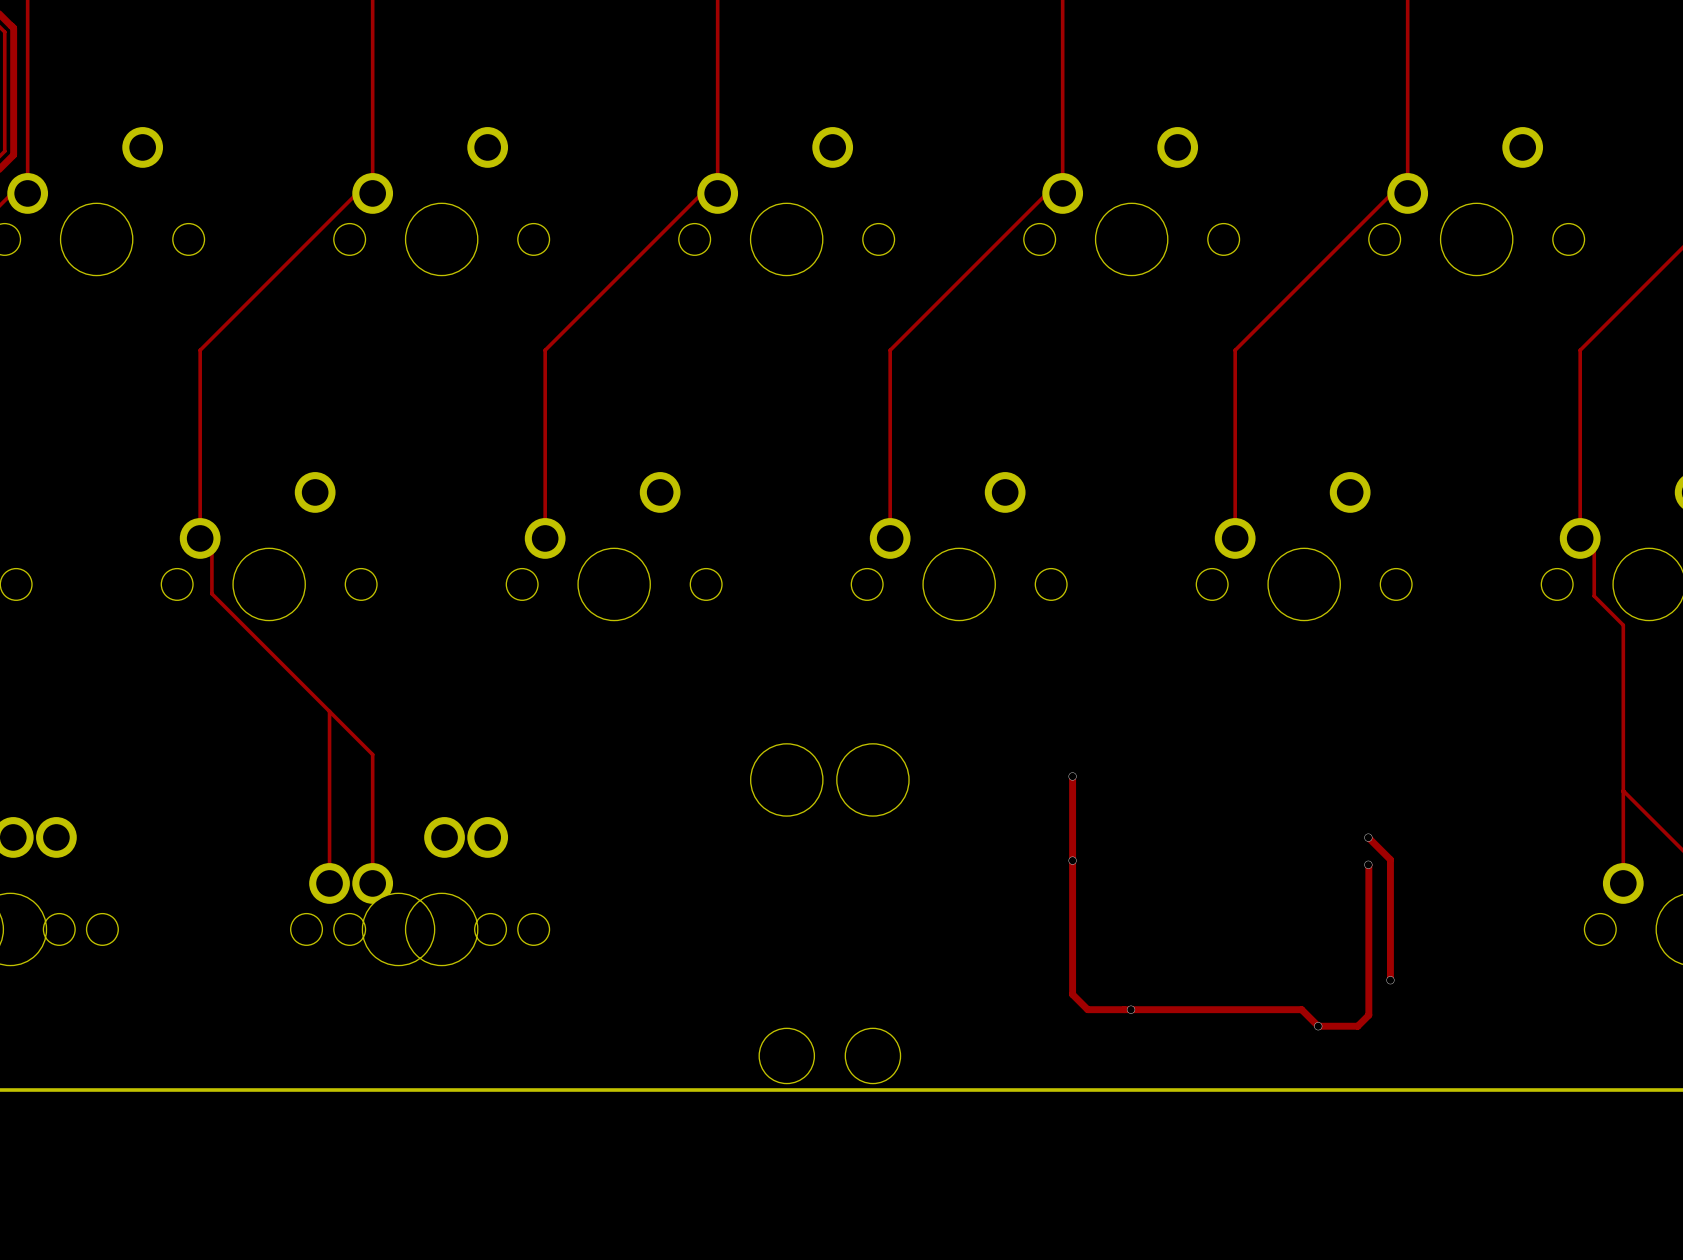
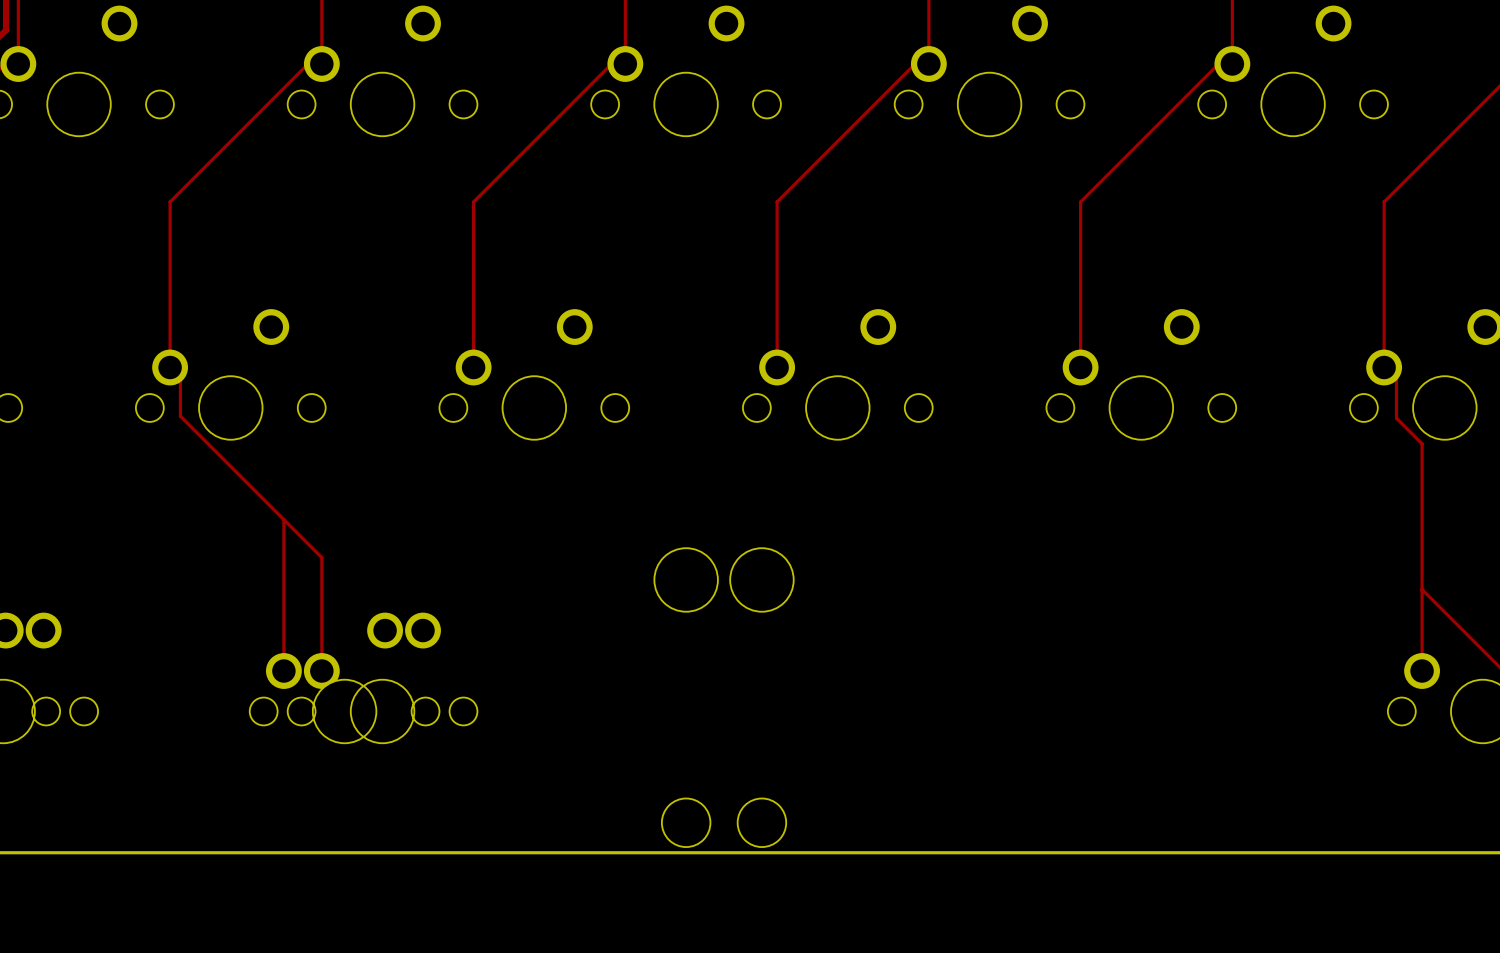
track: (1072, 776) (1072, 994) (1087, 1009) (1301, 1009) (1318, 1026) (1357, 1026) (1368, 1015) (1368, 864) -> none
via: (1072, 776) -> none
track: (1368, 837) (1390, 859) (1390, 980) -> none
via: (1368, 837) -> none
via: (1072, 860) -> none
via: (1368, 864) -> none
via: (1390, 980) -> none
via: (1131, 1009) -> none
via: (1318, 1026) -> none

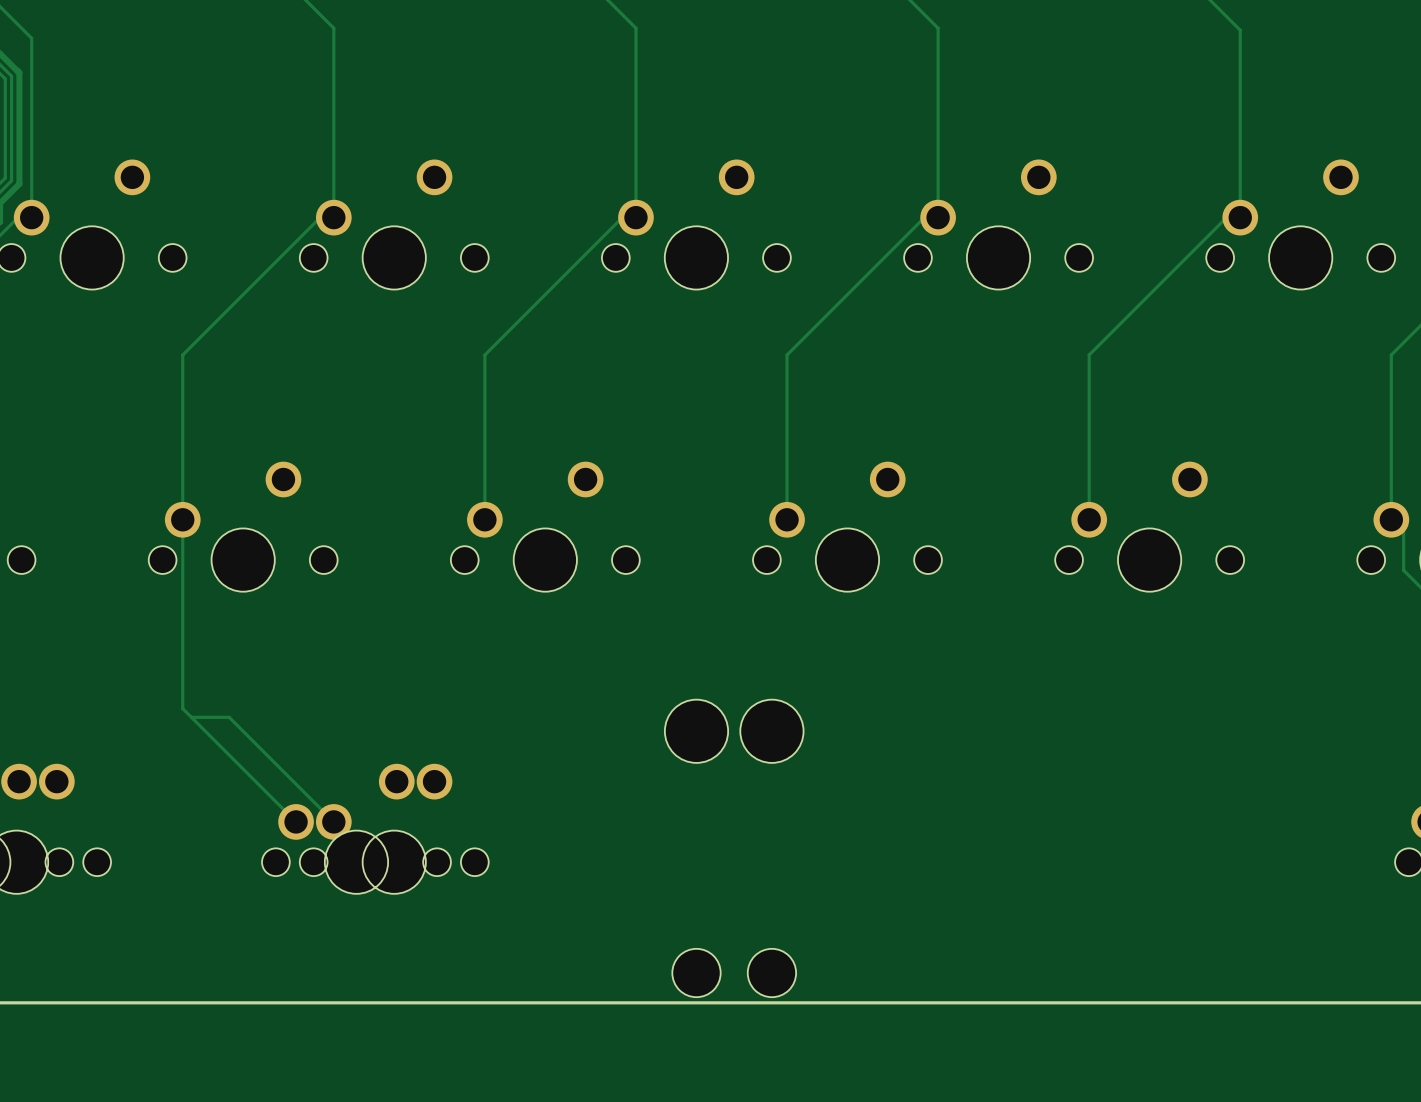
track: (180, 377) (180, 416) (321, 557) (321, 671) -> (191, 717) (229, 717) (333, 821)
track: (283, 519) (283, 671) -> (182, 519) (182, 708) (296, 821)

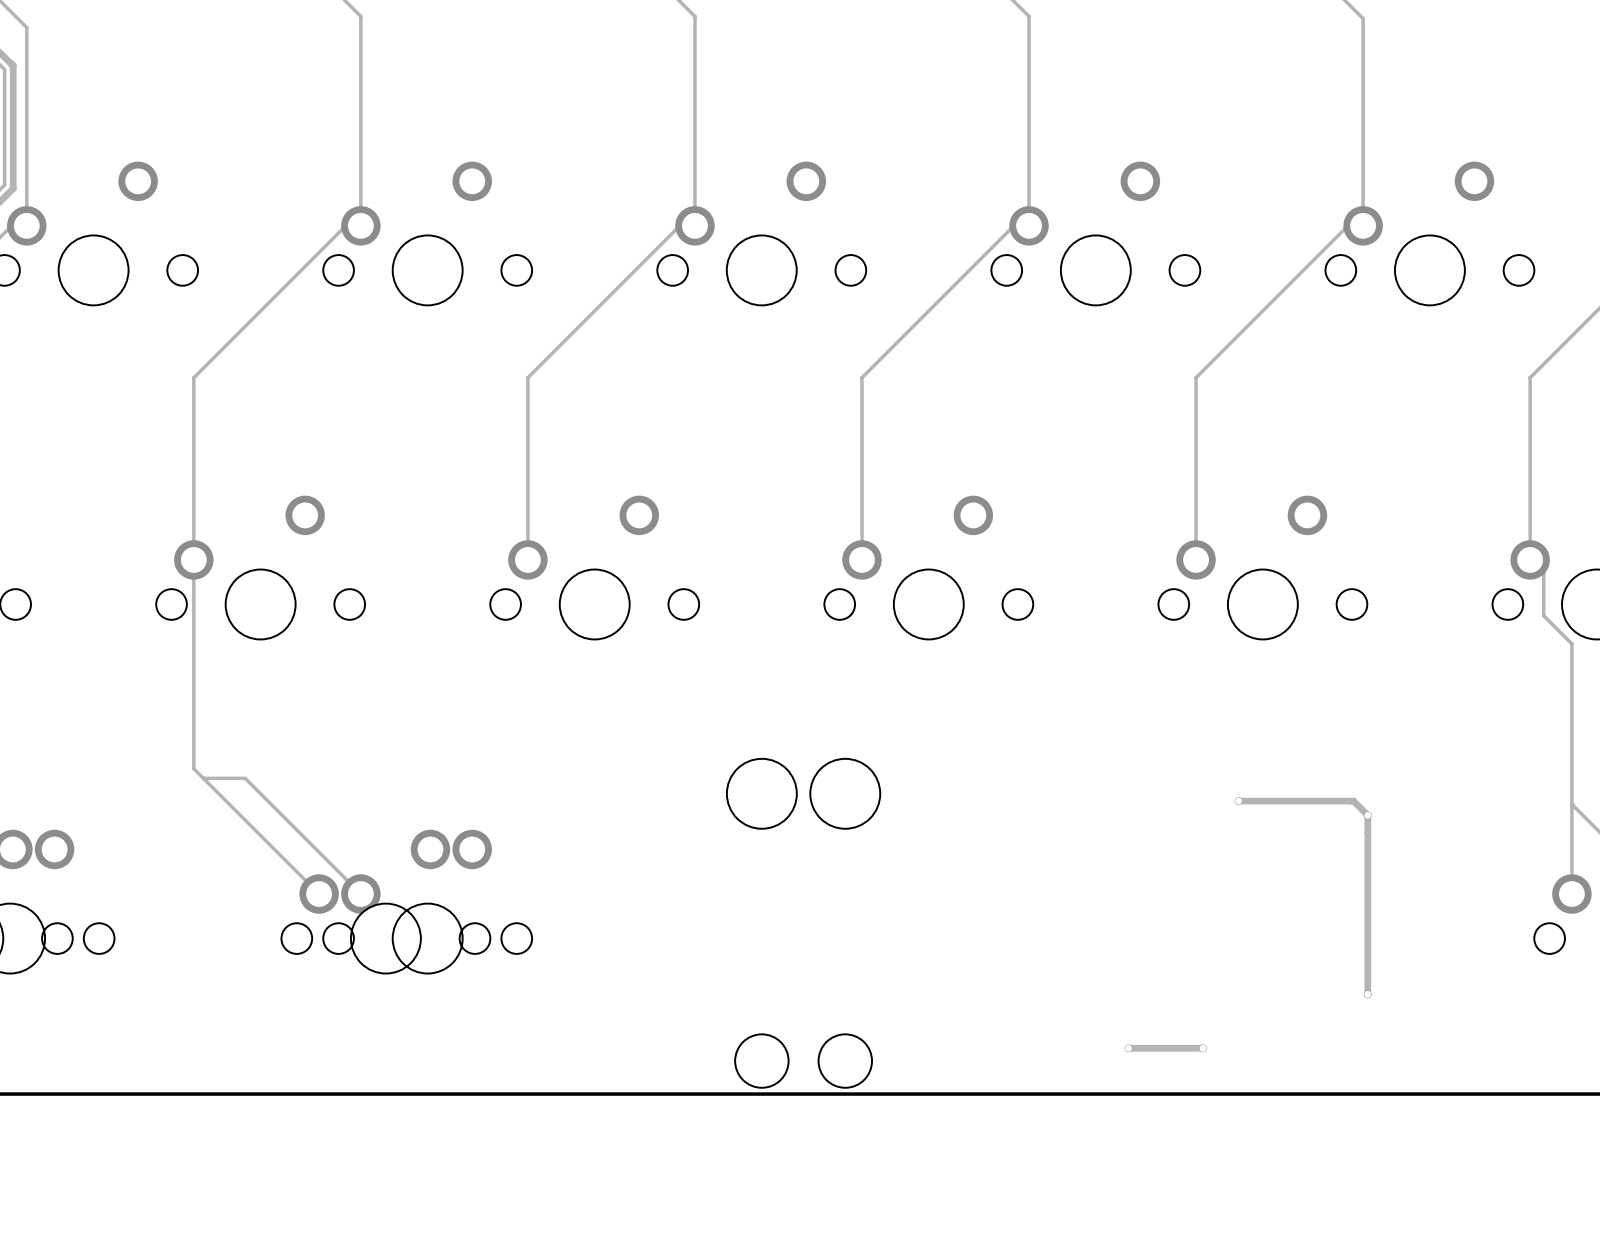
track: none -> (1238, 801) (1353, 801) (1367, 815) (1367, 994)
via: none -> (1238, 801)
via: none -> (1367, 815)
via: none -> (1367, 994)
track: none -> (1128, 1048) (1202, 1048)
via: none -> (1128, 1048)
via: none -> (1202, 1048)

